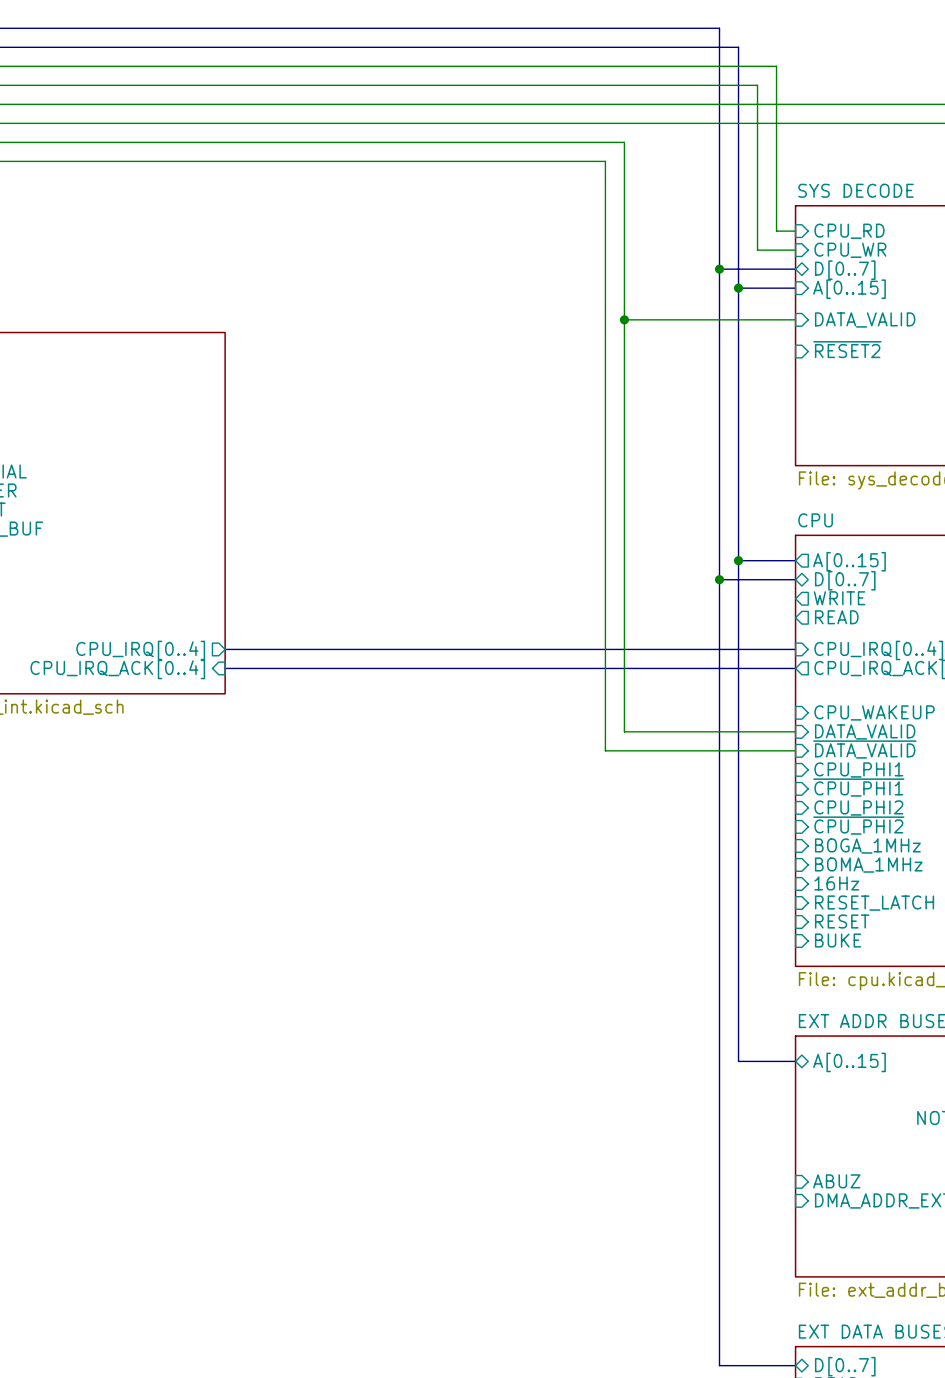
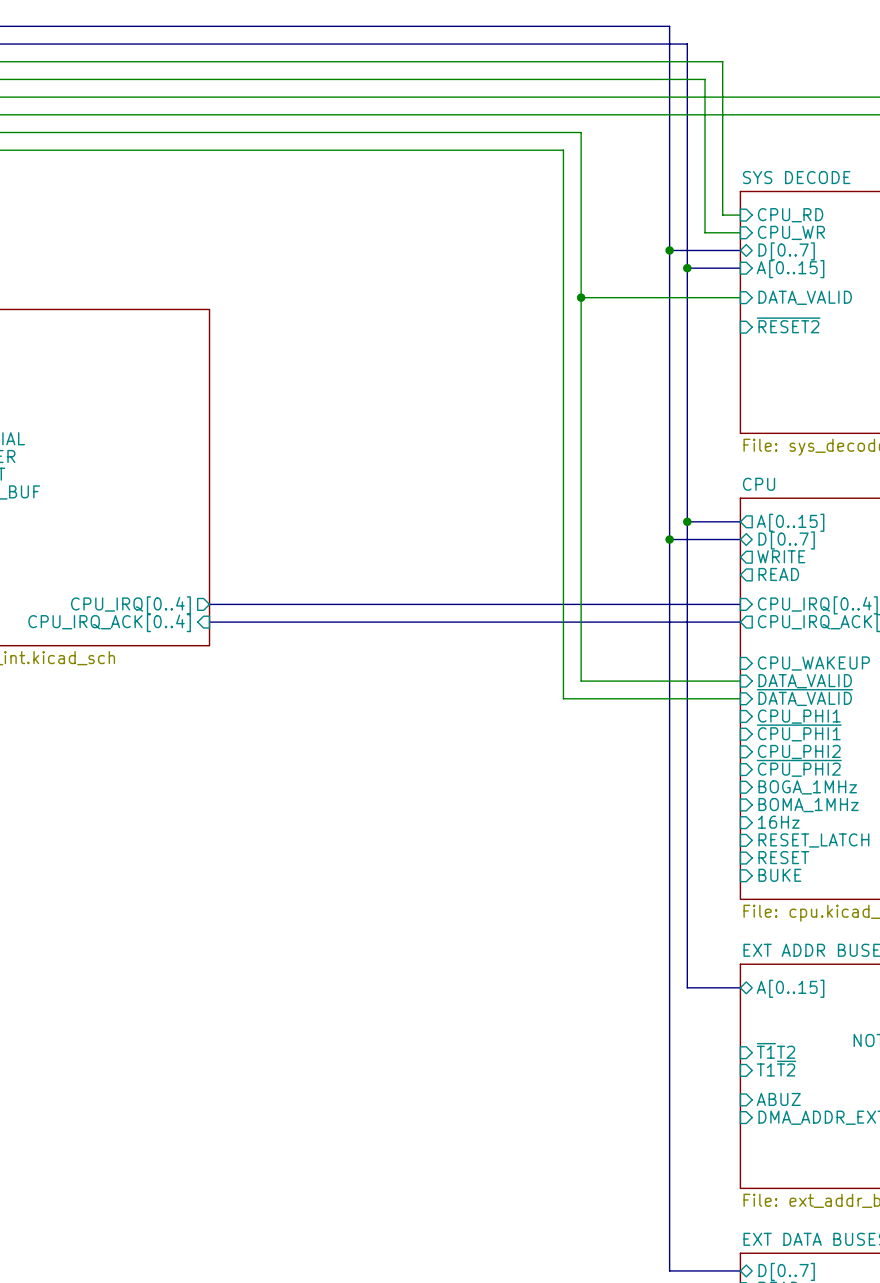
sheet pin: none -> ~{T1}T2 (775, 1050)
sheet pin: none -> T1~{T2} (776, 1068)

